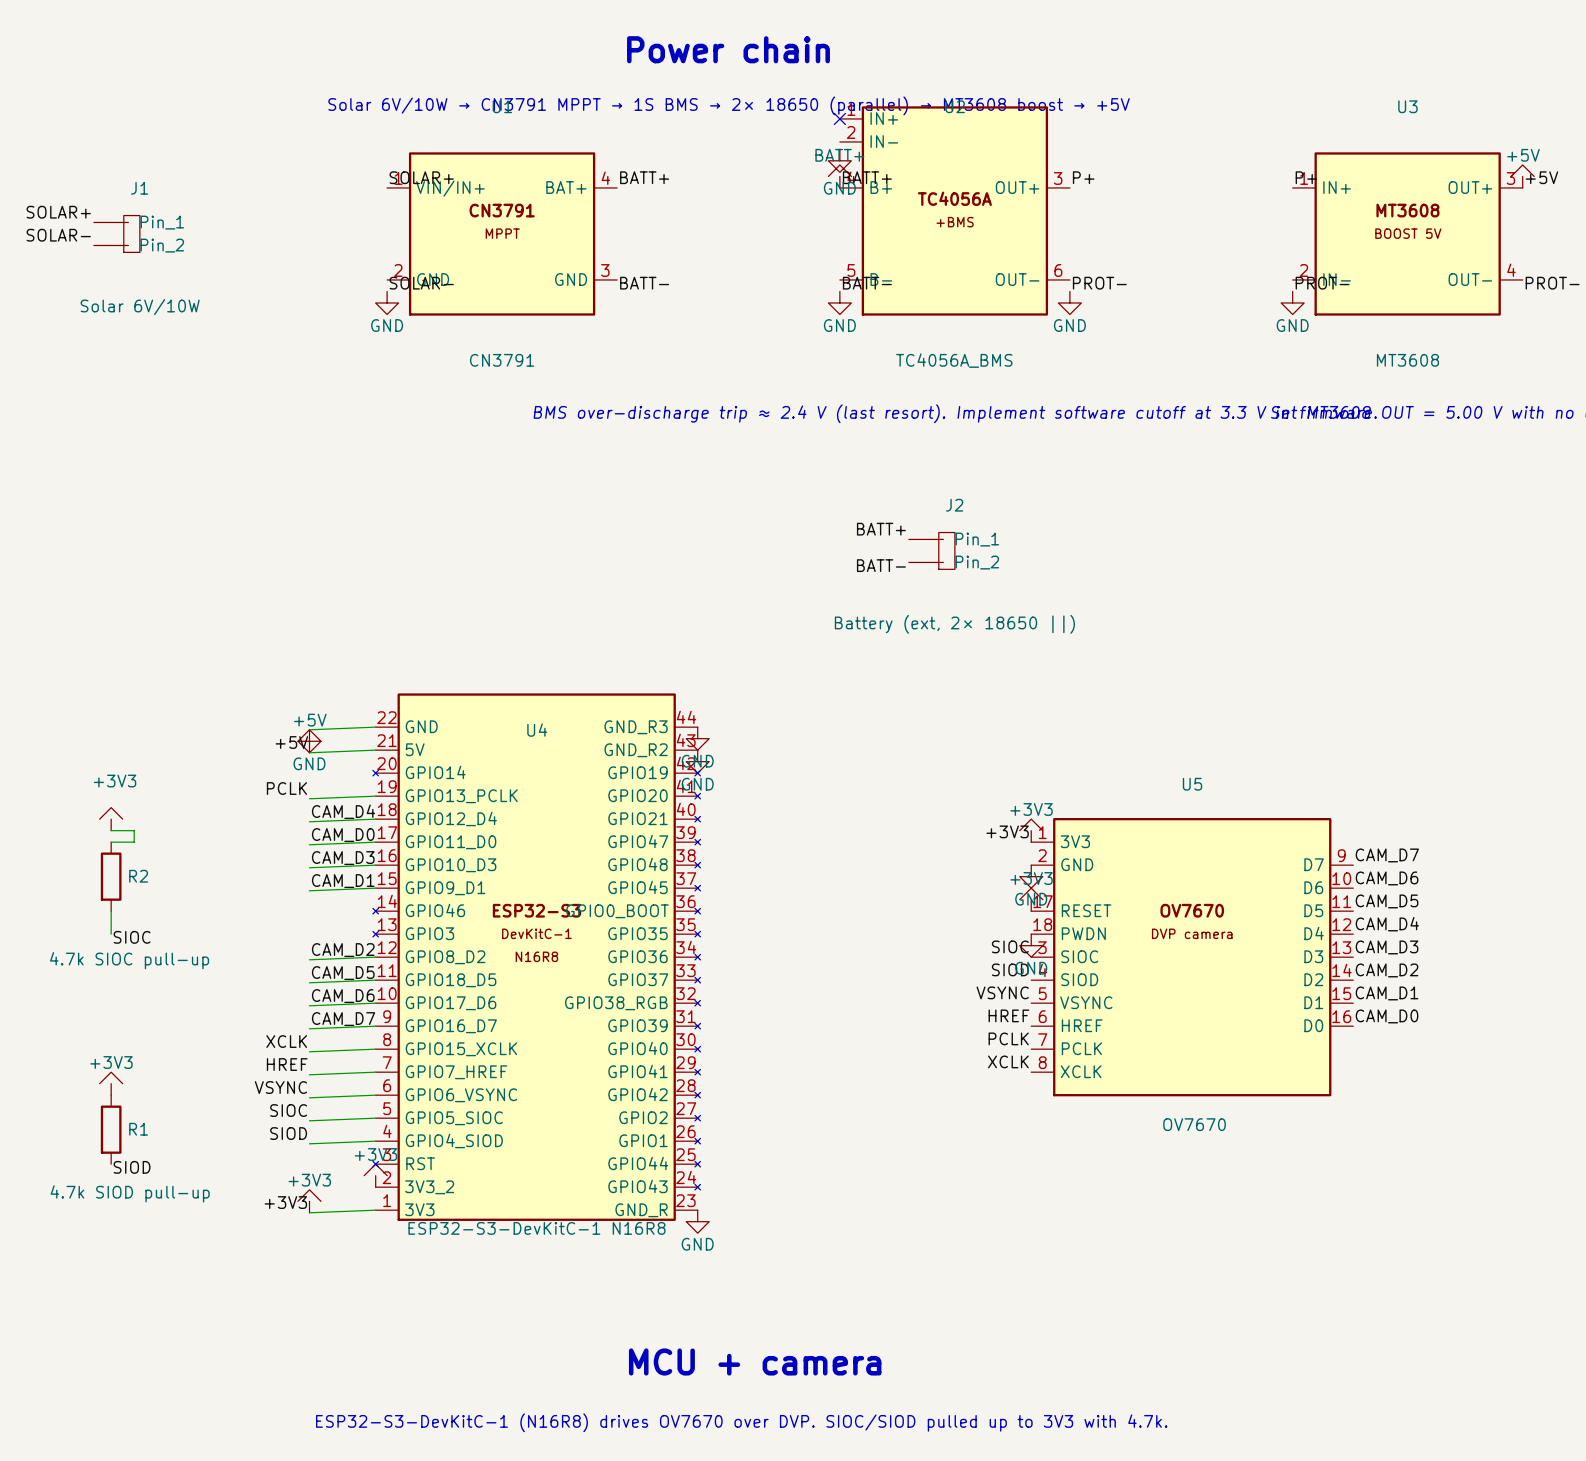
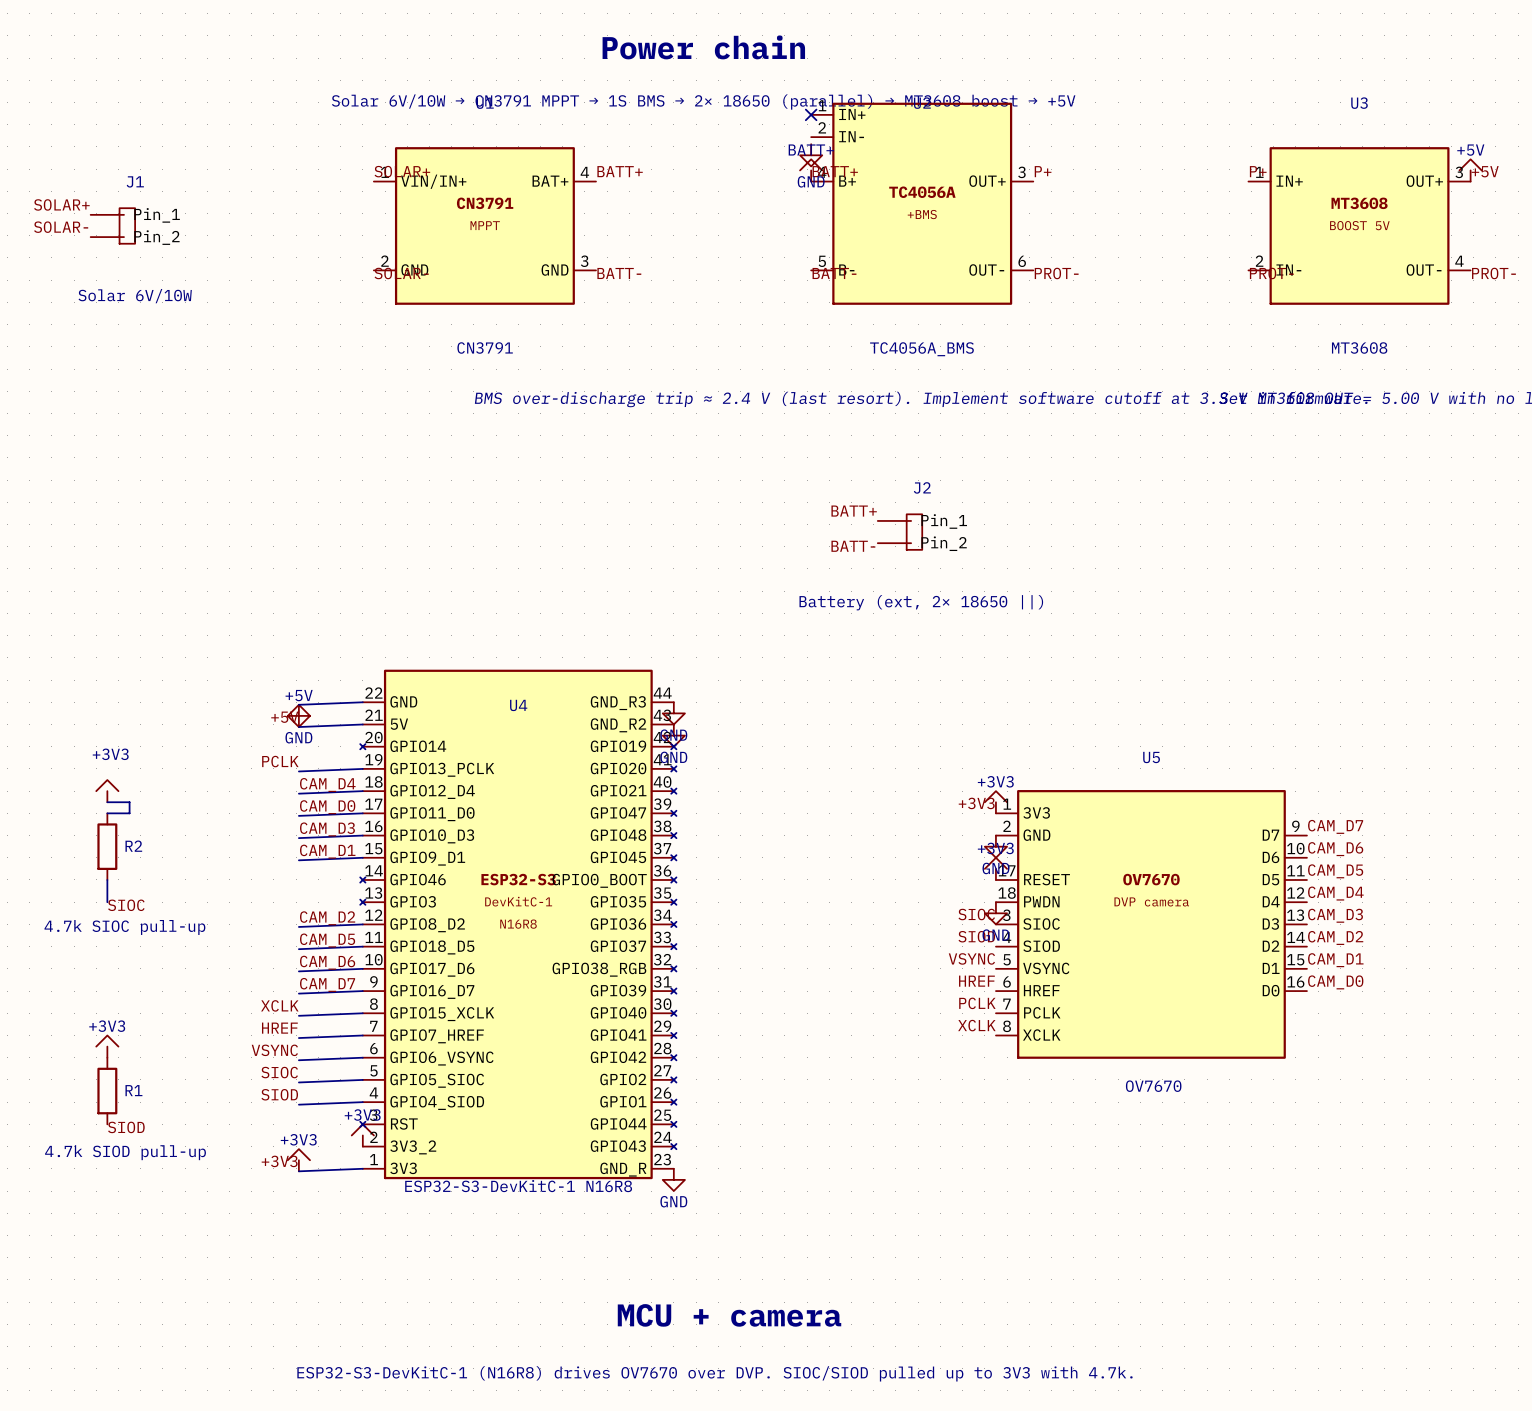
power symbol: GND (387, 302) -> none
power symbol: GND (839, 302) -> none
power symbol: GND (1069, 302) -> none
power symbol: GND (1292, 302) -> none

